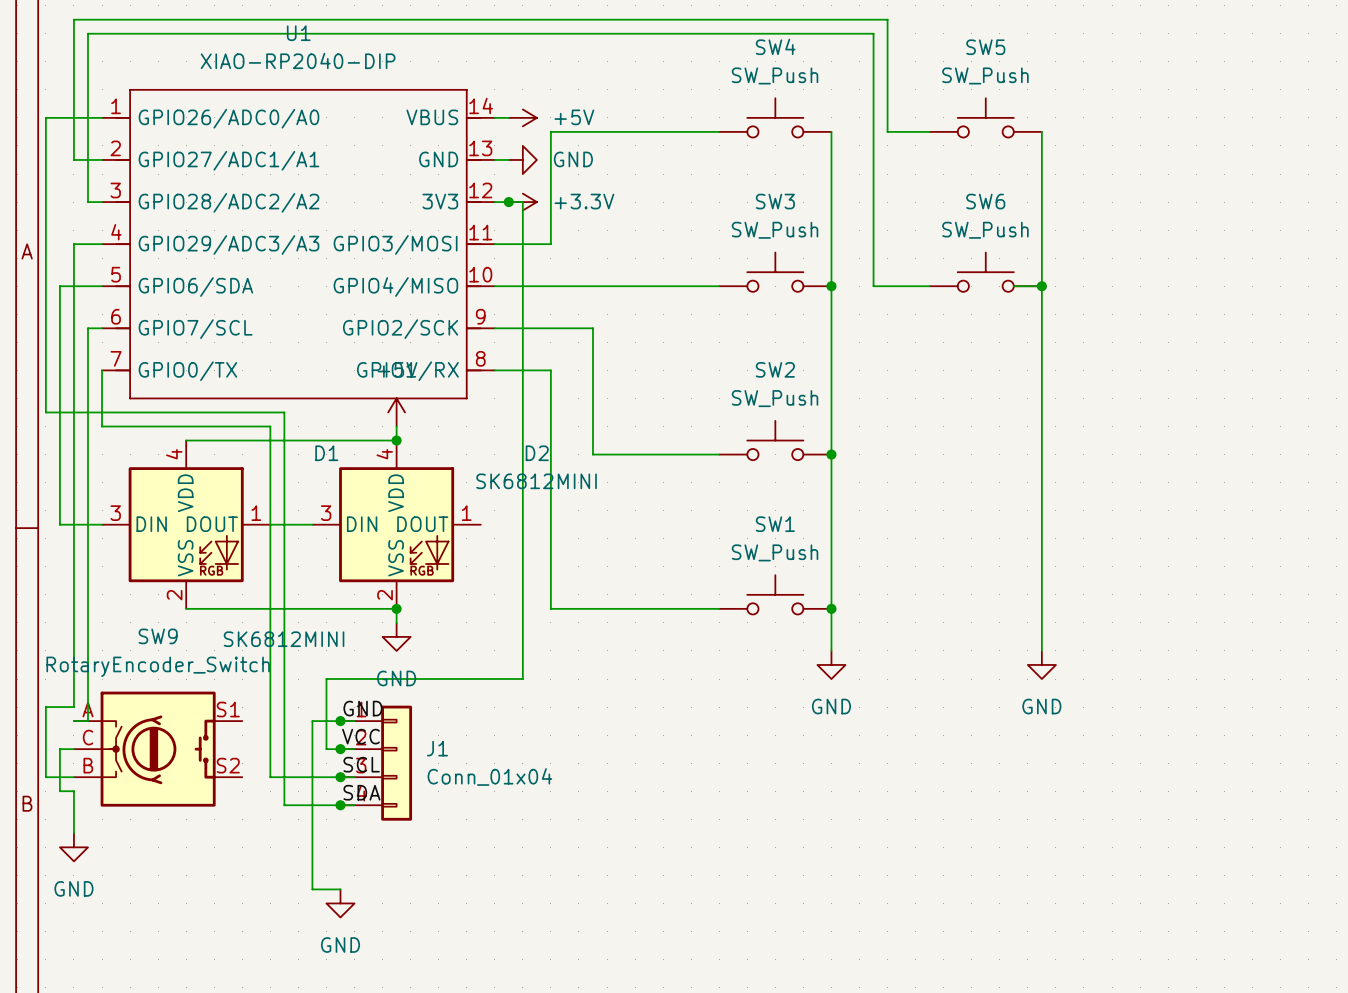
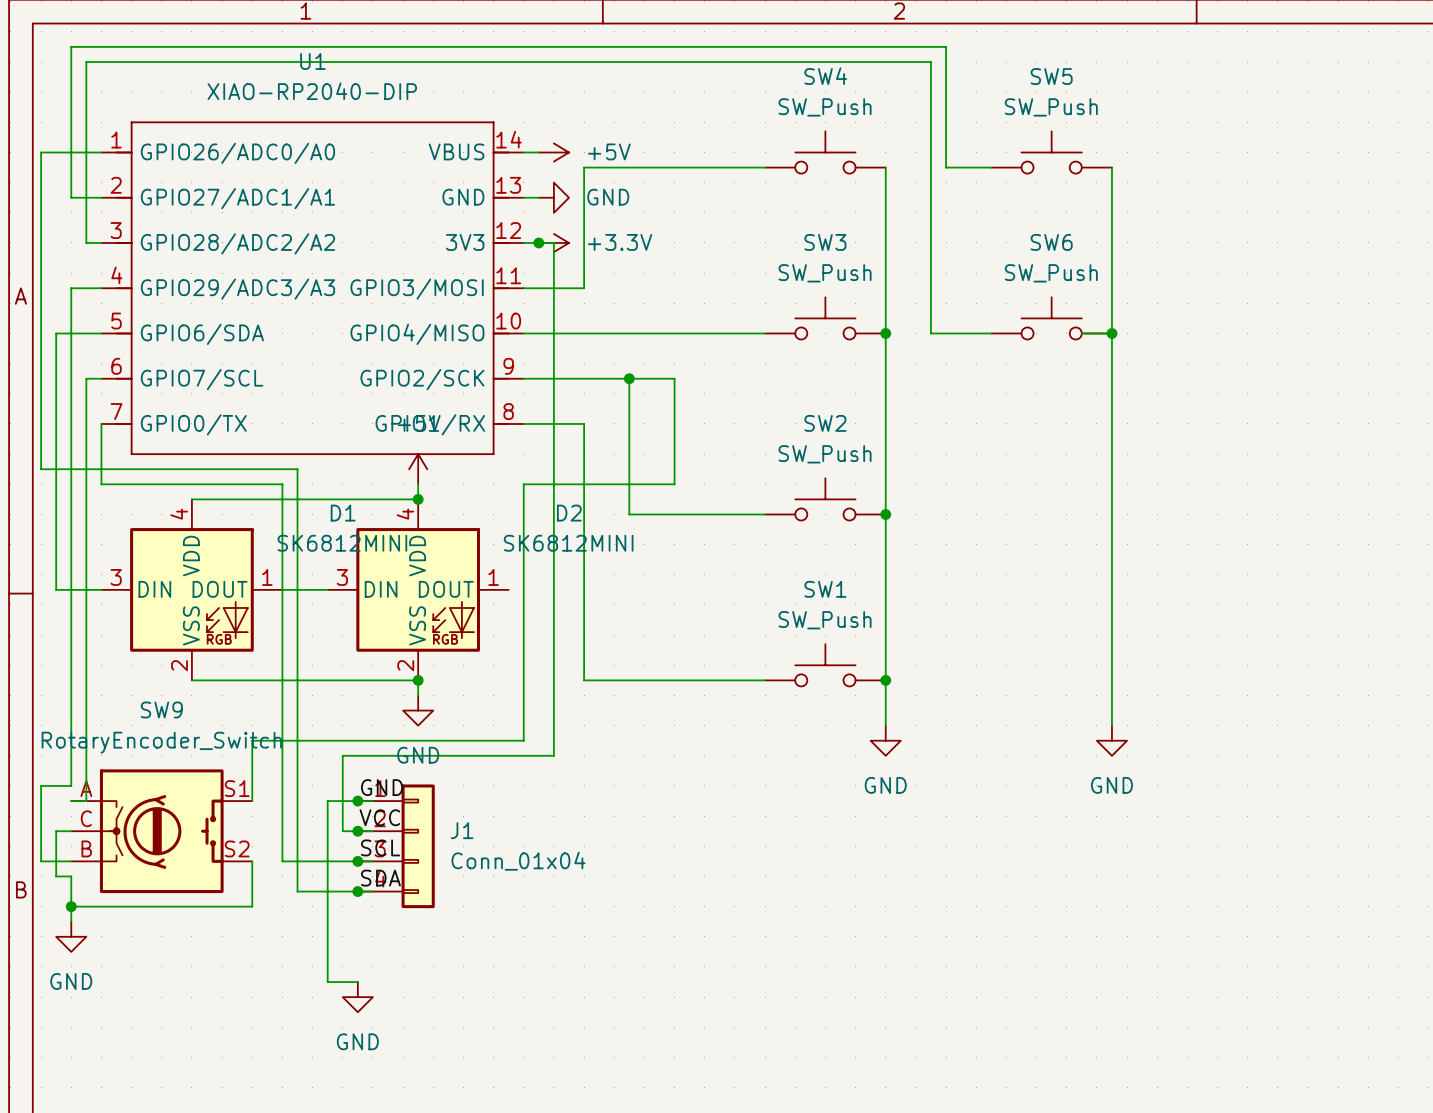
wire: none -> (629, 378) (674, 378) (674, 484) (523, 484) (523, 740) (252, 740) (252, 801)
junction: none -> (629, 378)
D1 value position: SK6812MINI (284, 639) -> SK6812MINI (342, 543)
wire: none -> (252, 861) (252, 906) (71, 906)
junction: none -> (71, 906)

